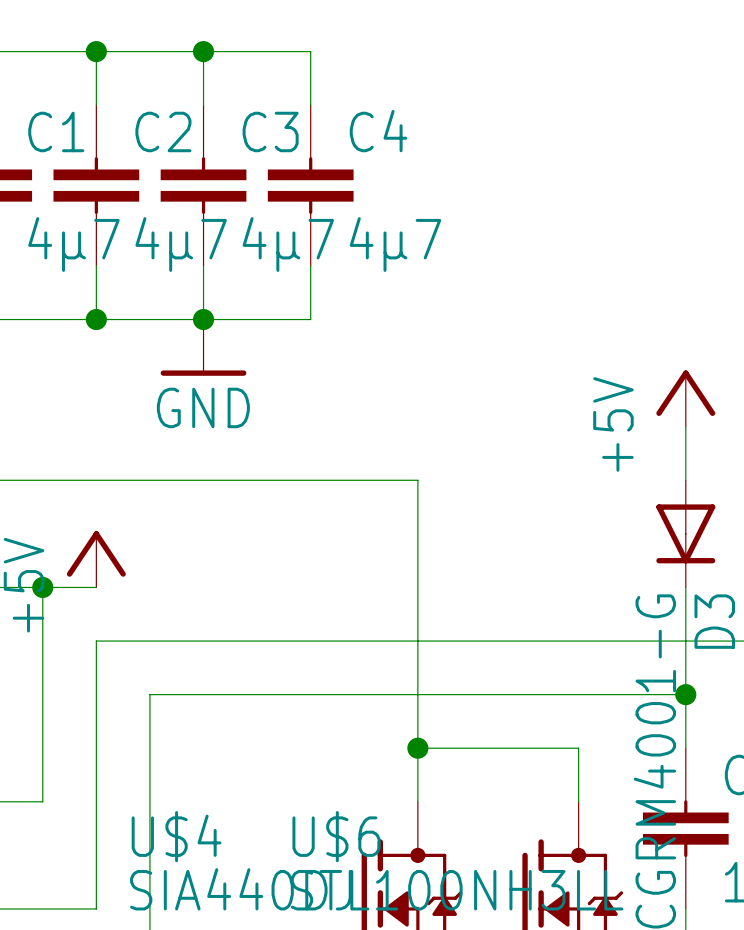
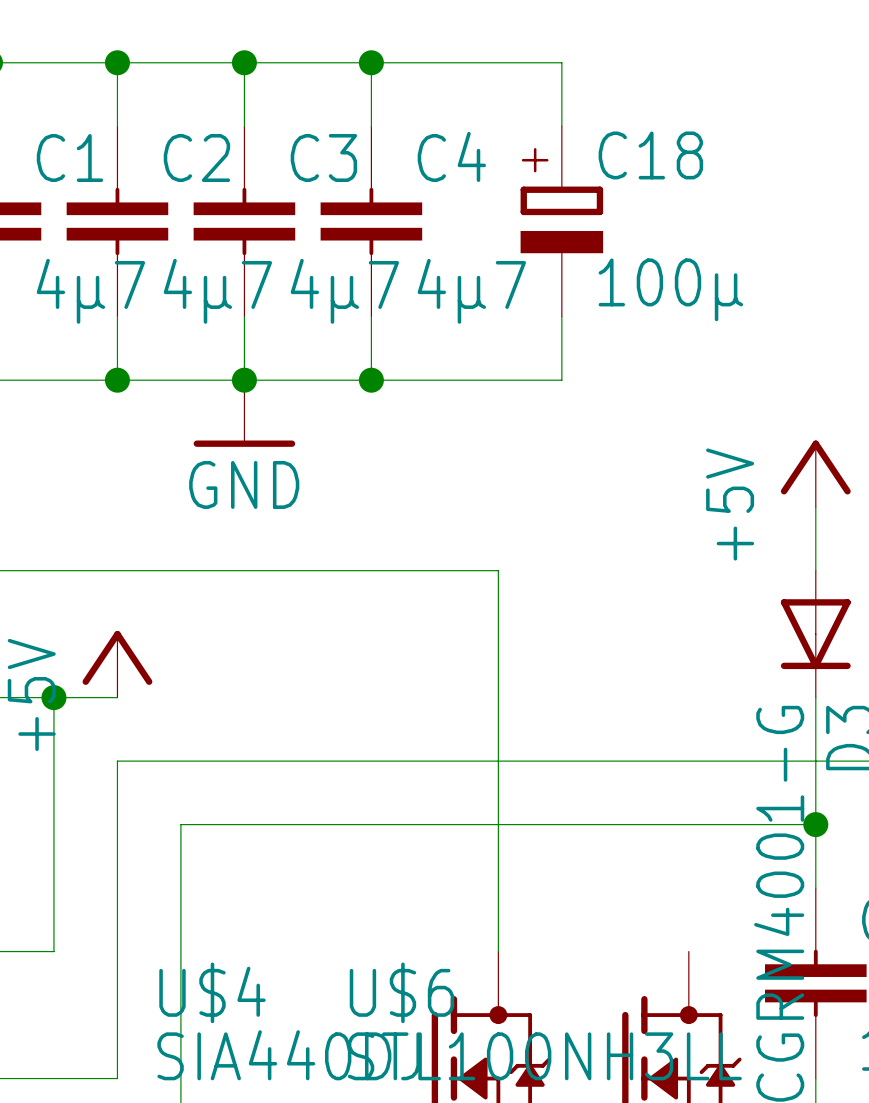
wire: none -> (371, 62) (561, 62) (561, 126)
junction: none -> (371, 62)
C18: none -> 100µ (561, 221)
wire: none -> (561, 316) (561, 380) (371, 380)
junction: none -> (371, 380)
wire: (417, 748) (578, 748) (578, 801) -> none
junction: (417, 748) -> none

